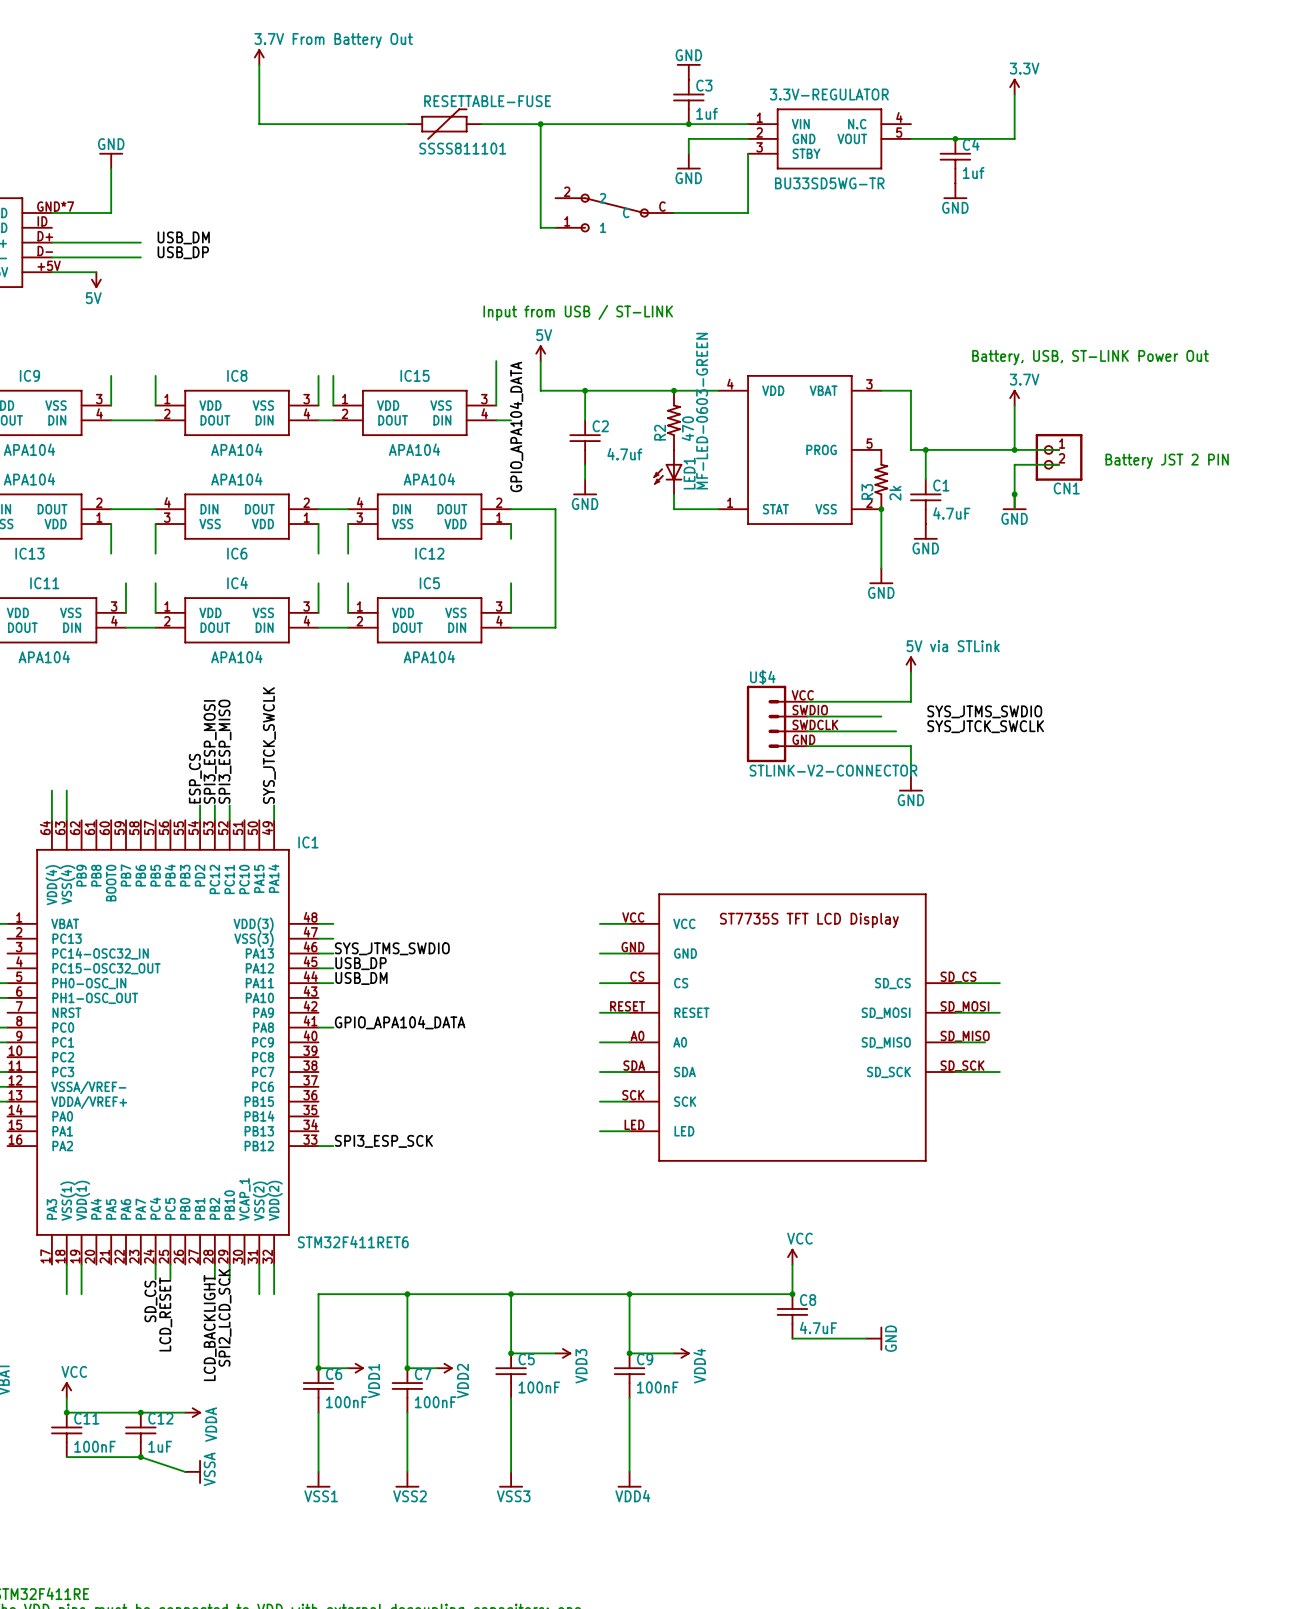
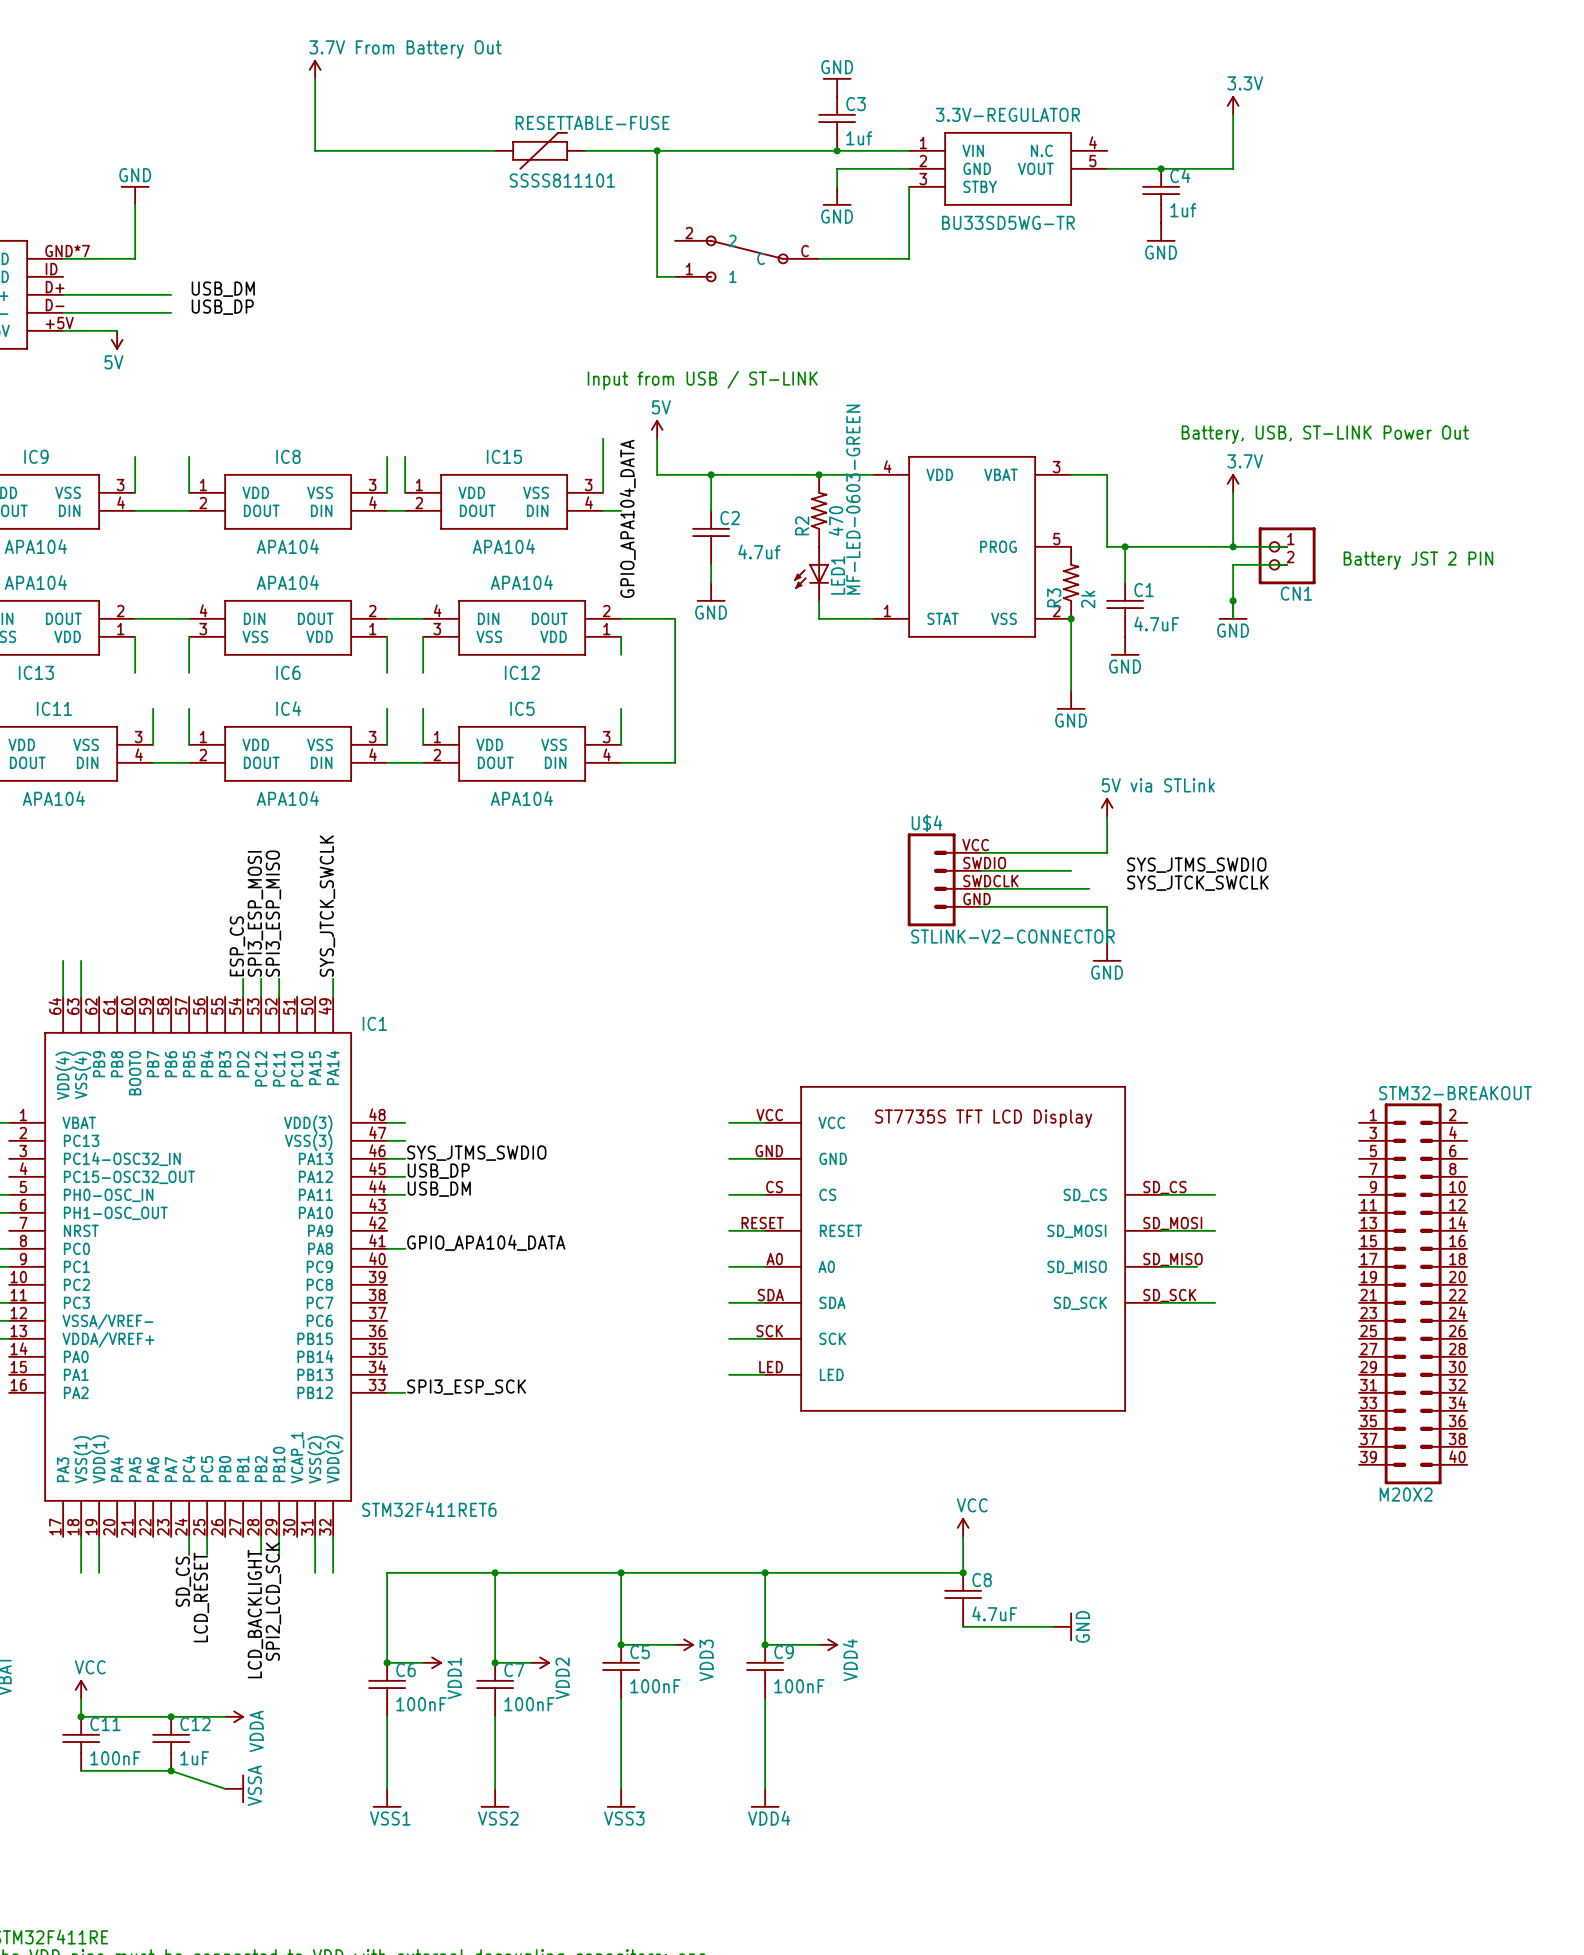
STM32-BREAKOUT: none -> M20X2 (1413, 1293)

